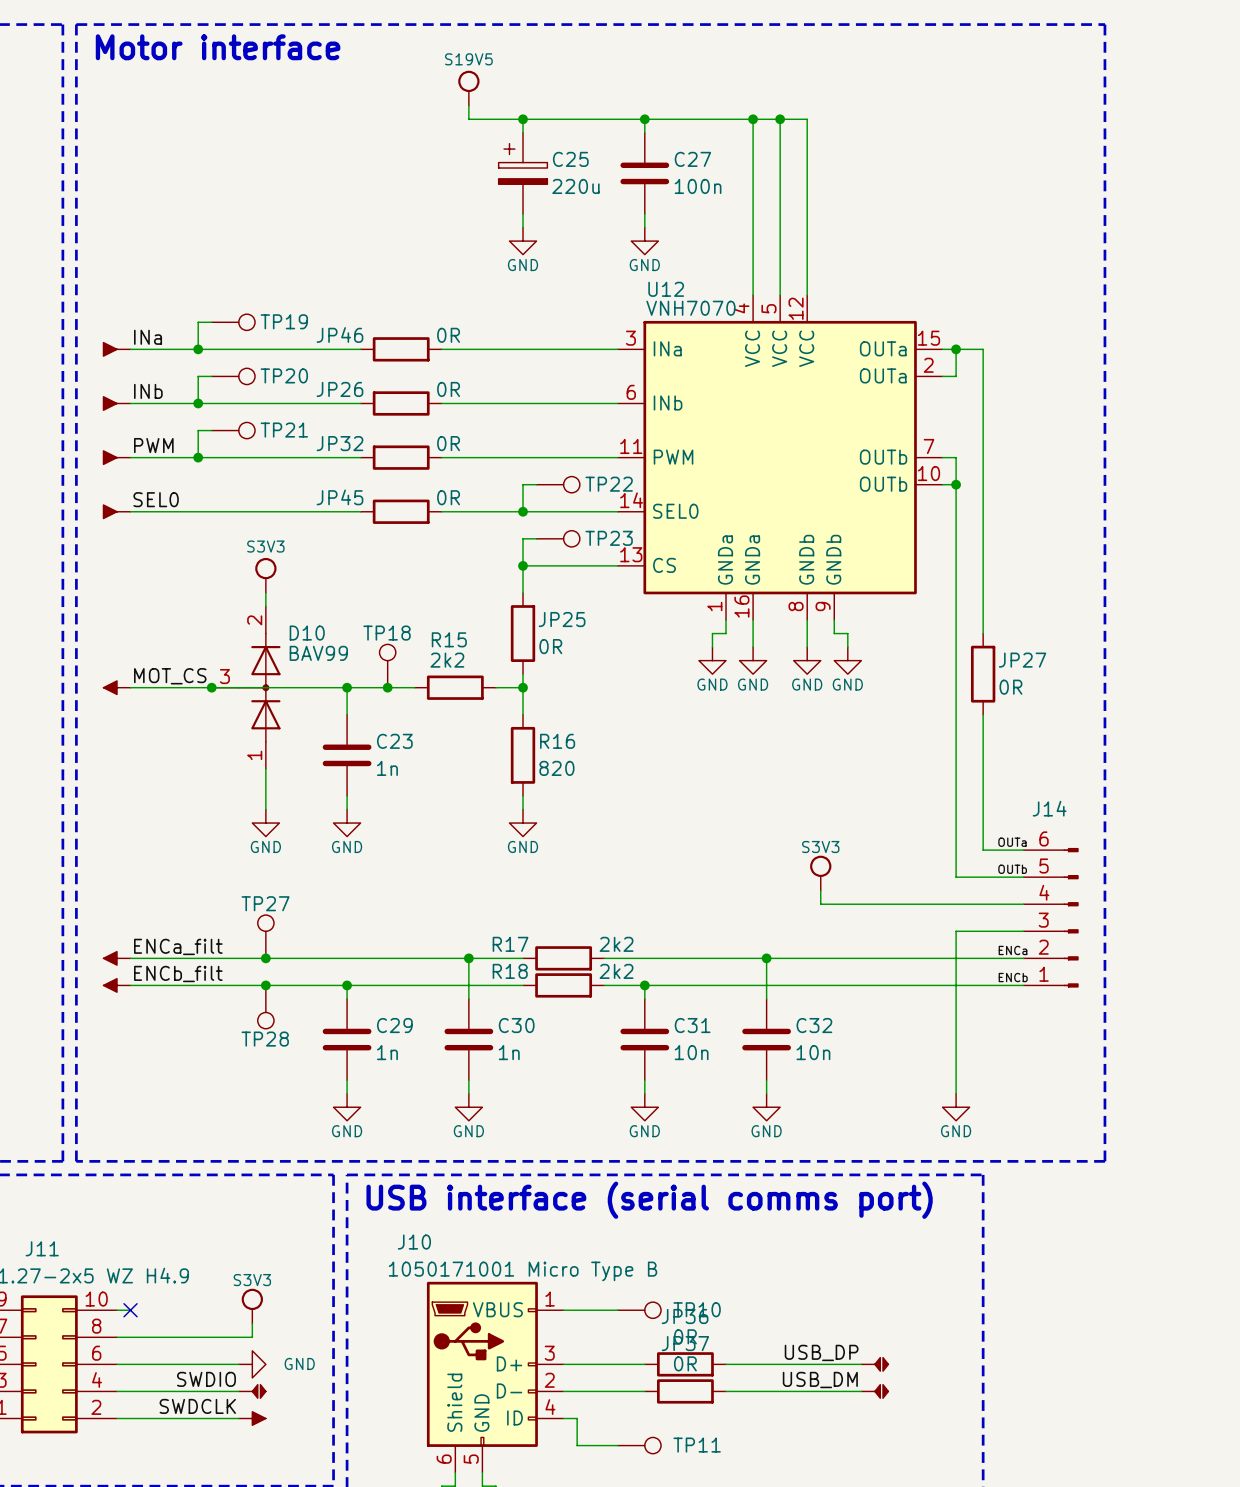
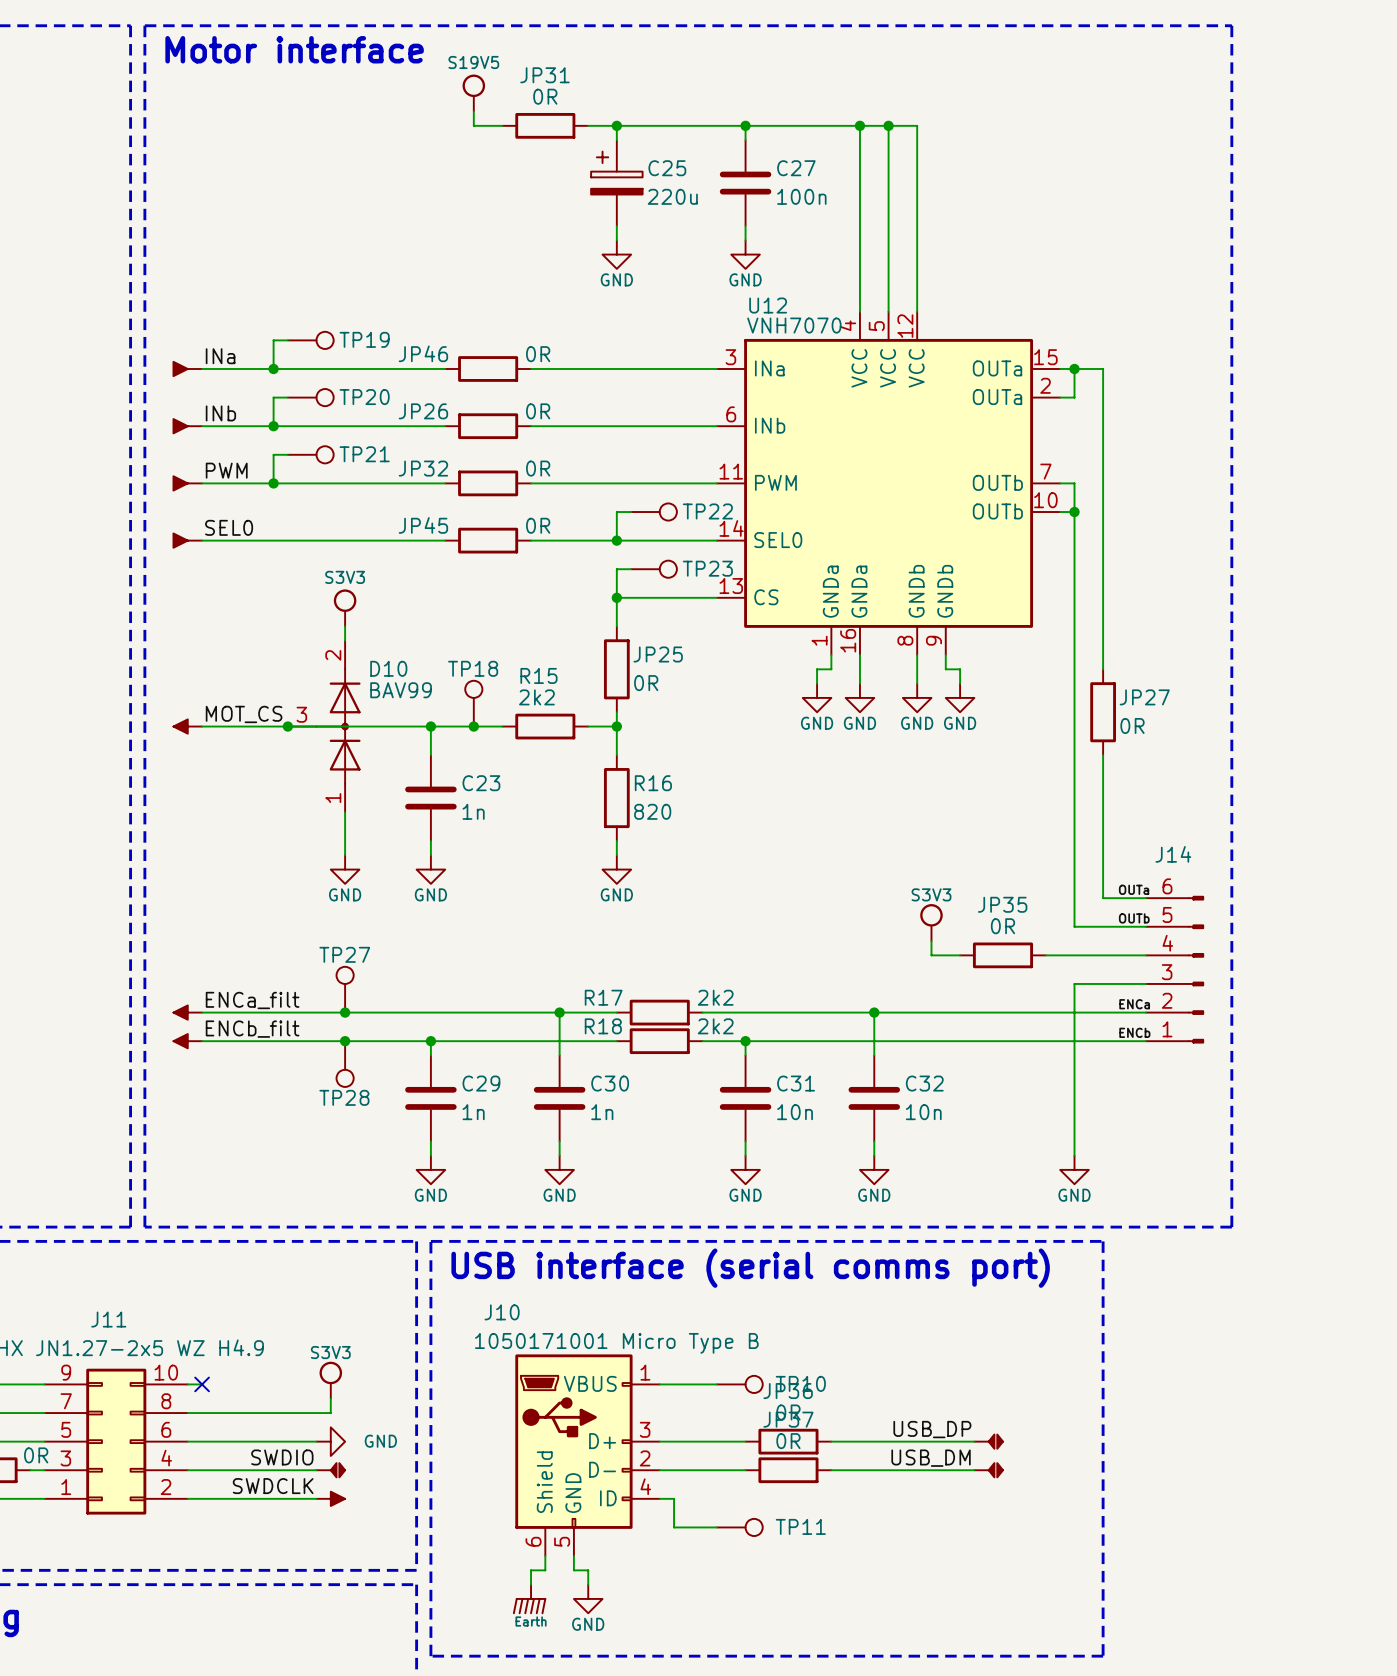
power symbol position: S19V5 (468, 88) -> S19V5 (473, 93)
wire: (468, 105) (468, 119) (495, 119) -> (473, 111) (473, 125) (502, 125)
JP31: none -> 0R (545, 125)
wire: (847, 904) (929, 904) -> none
JP35: none -> 0R (1002, 955)

